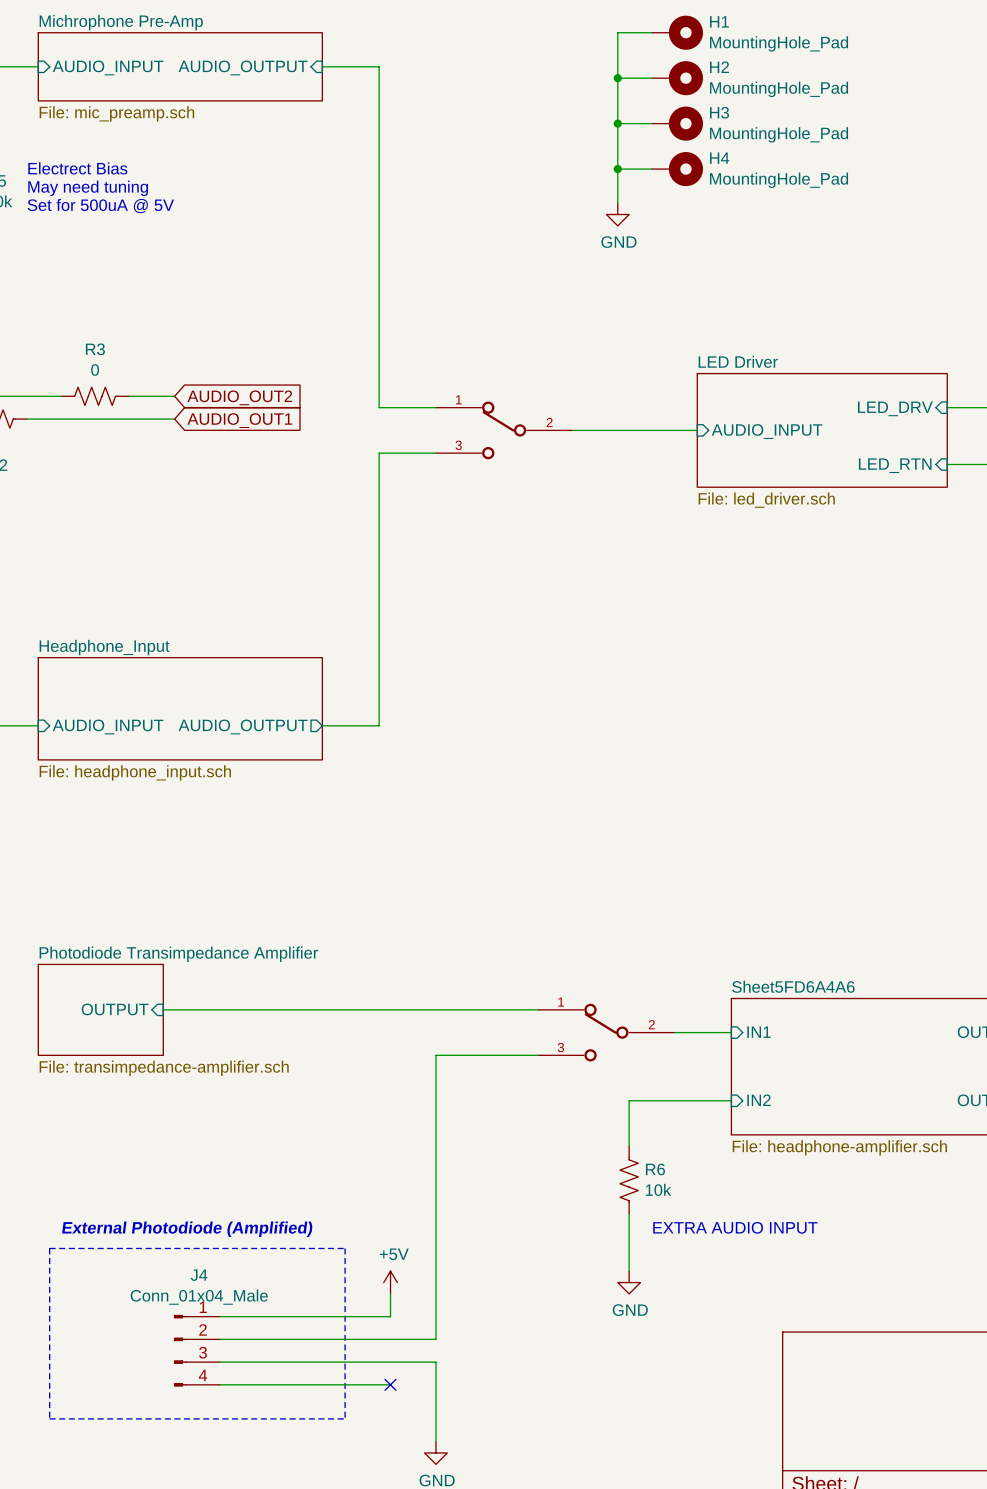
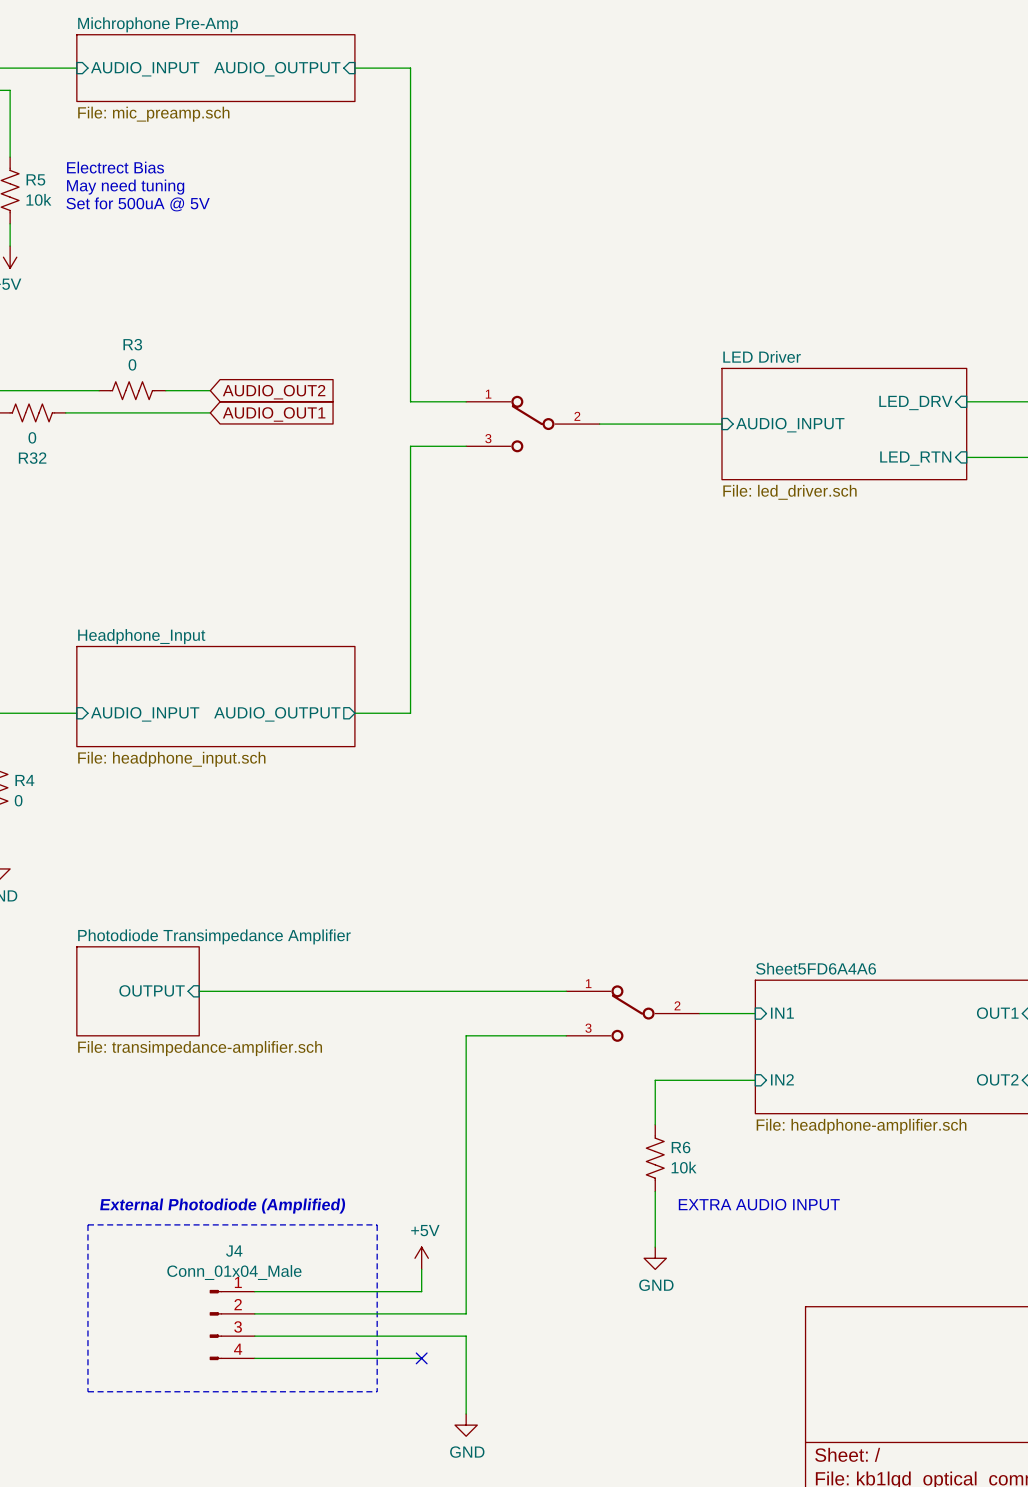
wire: (651, 32) (617, 32) (617, 203) -> none
H1: MountingHole_Pad (677, 32) -> none
wire: (617, 78) (651, 78) -> none
junction: (617, 78) -> none
H2: MountingHole_Pad (677, 78) -> none
wire: (617, 123) (651, 123) -> none
junction: (617, 123) -> none
H3: MountingHole_Pad (677, 123) -> none
wire: (617, 169) (651, 169) -> none
junction: (617, 169) -> none
H4: MountingHole_Pad (677, 169) -> none
power symbol: GND (617, 214) -> none

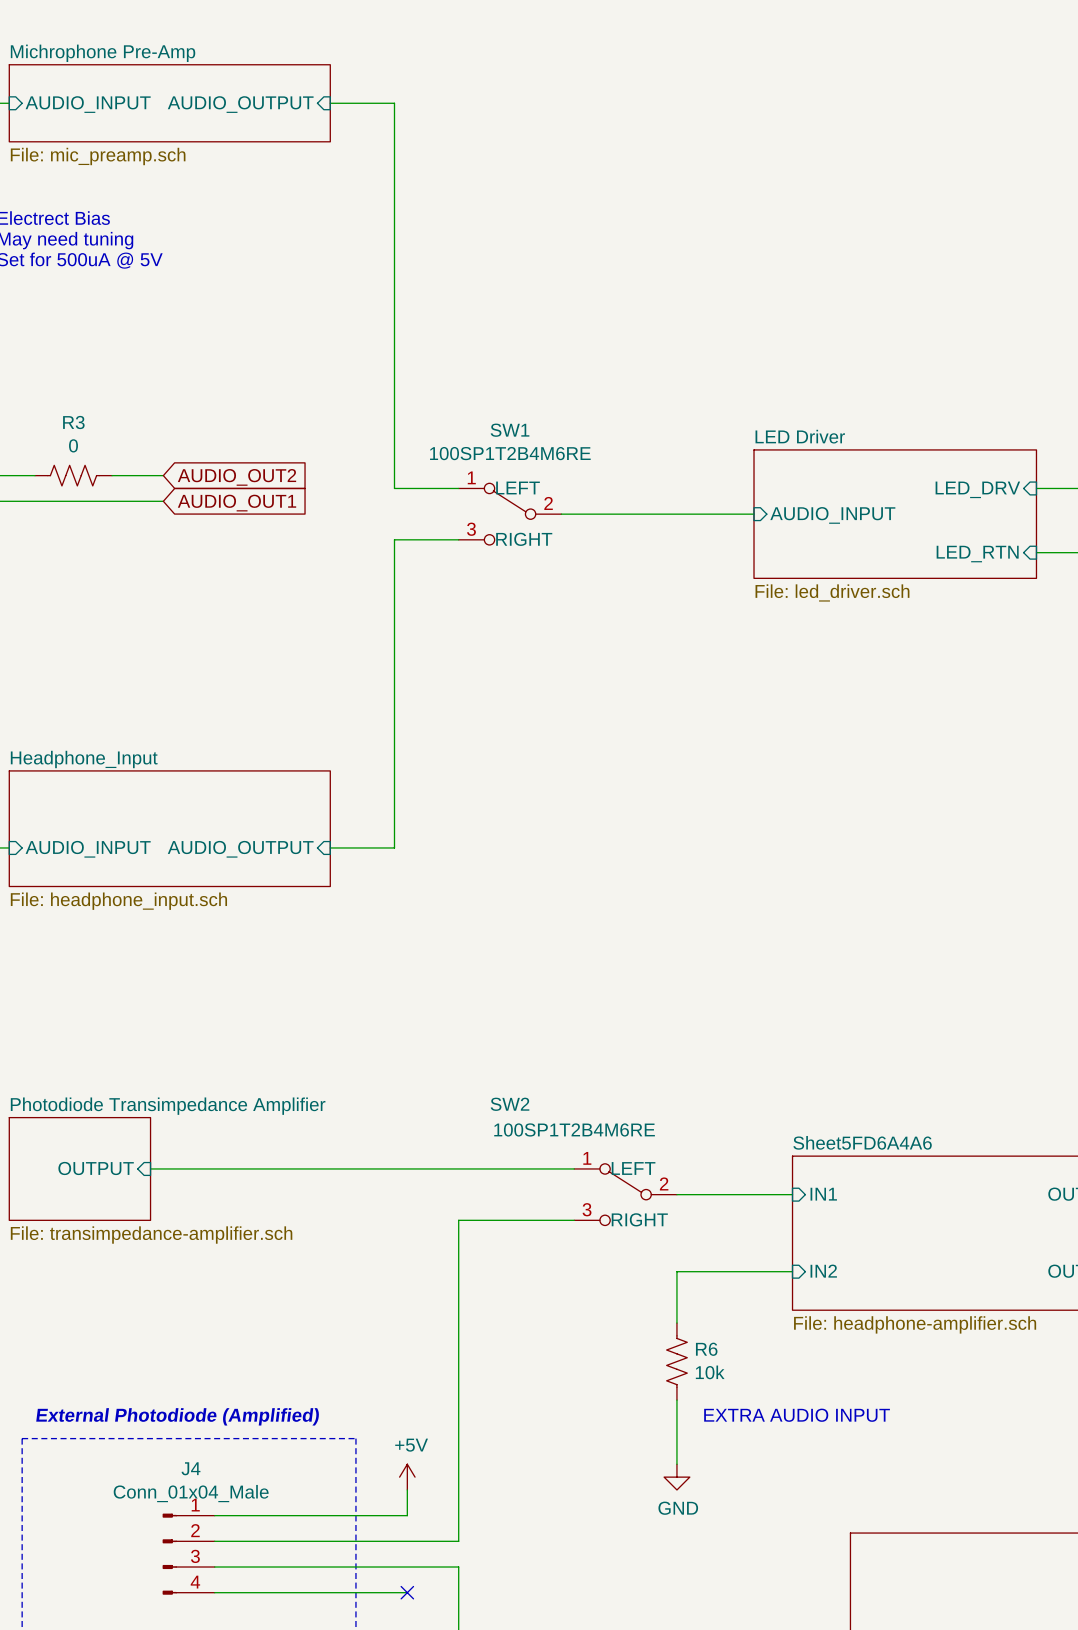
SW1: none -> 100SP1T2B4M6RE (510, 514)
part: (532, 424) -> none
sheet pin shape: output (277, 714) -> input (240, 849)
SW2: none -> 100SP1T2B4M6RE (625, 1194)
part: (633, 1013) -> none

